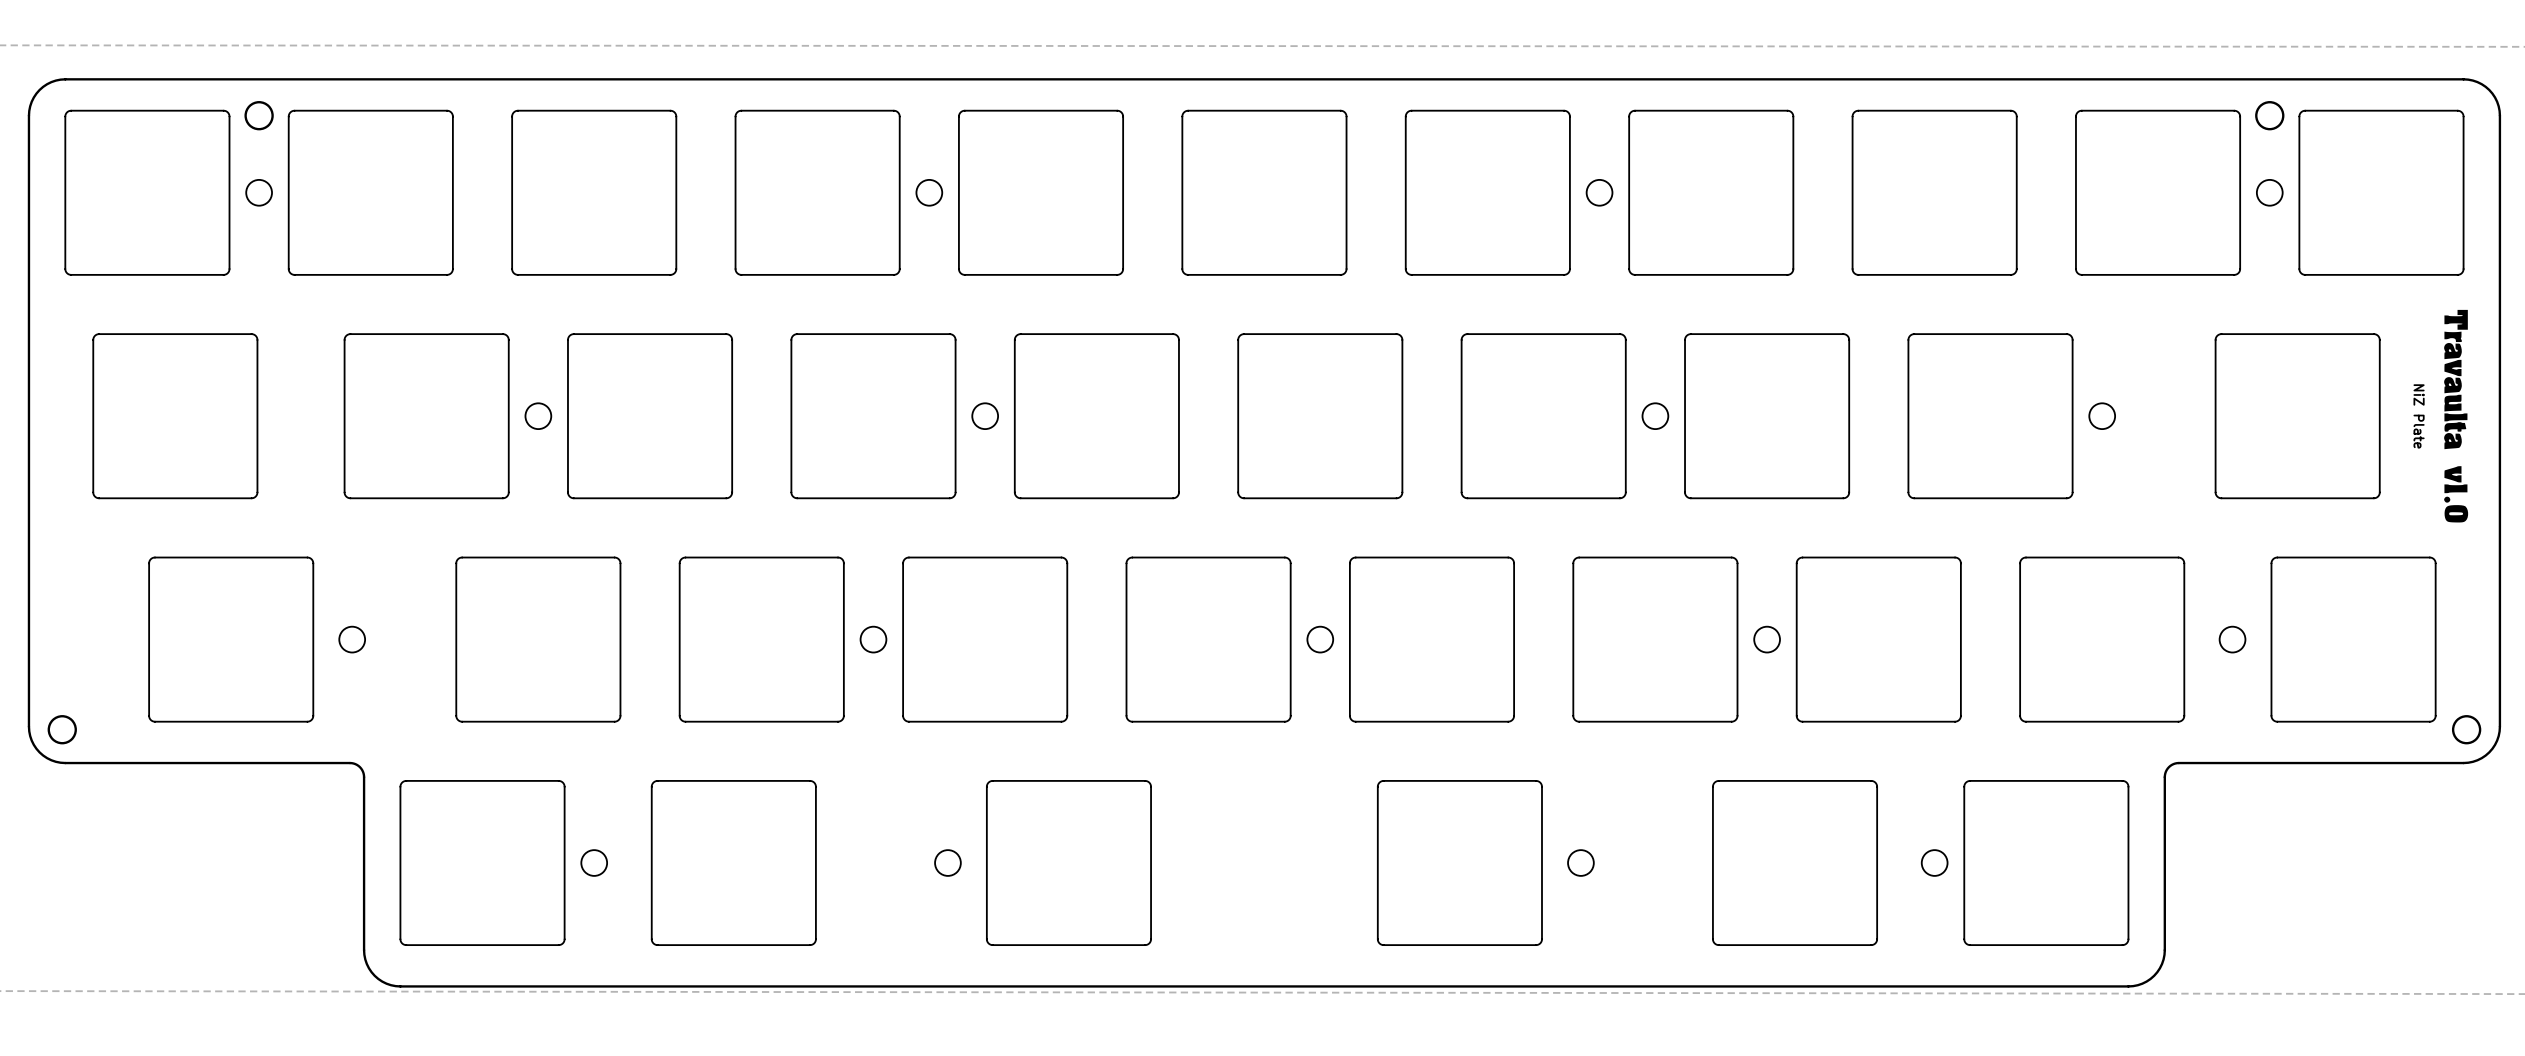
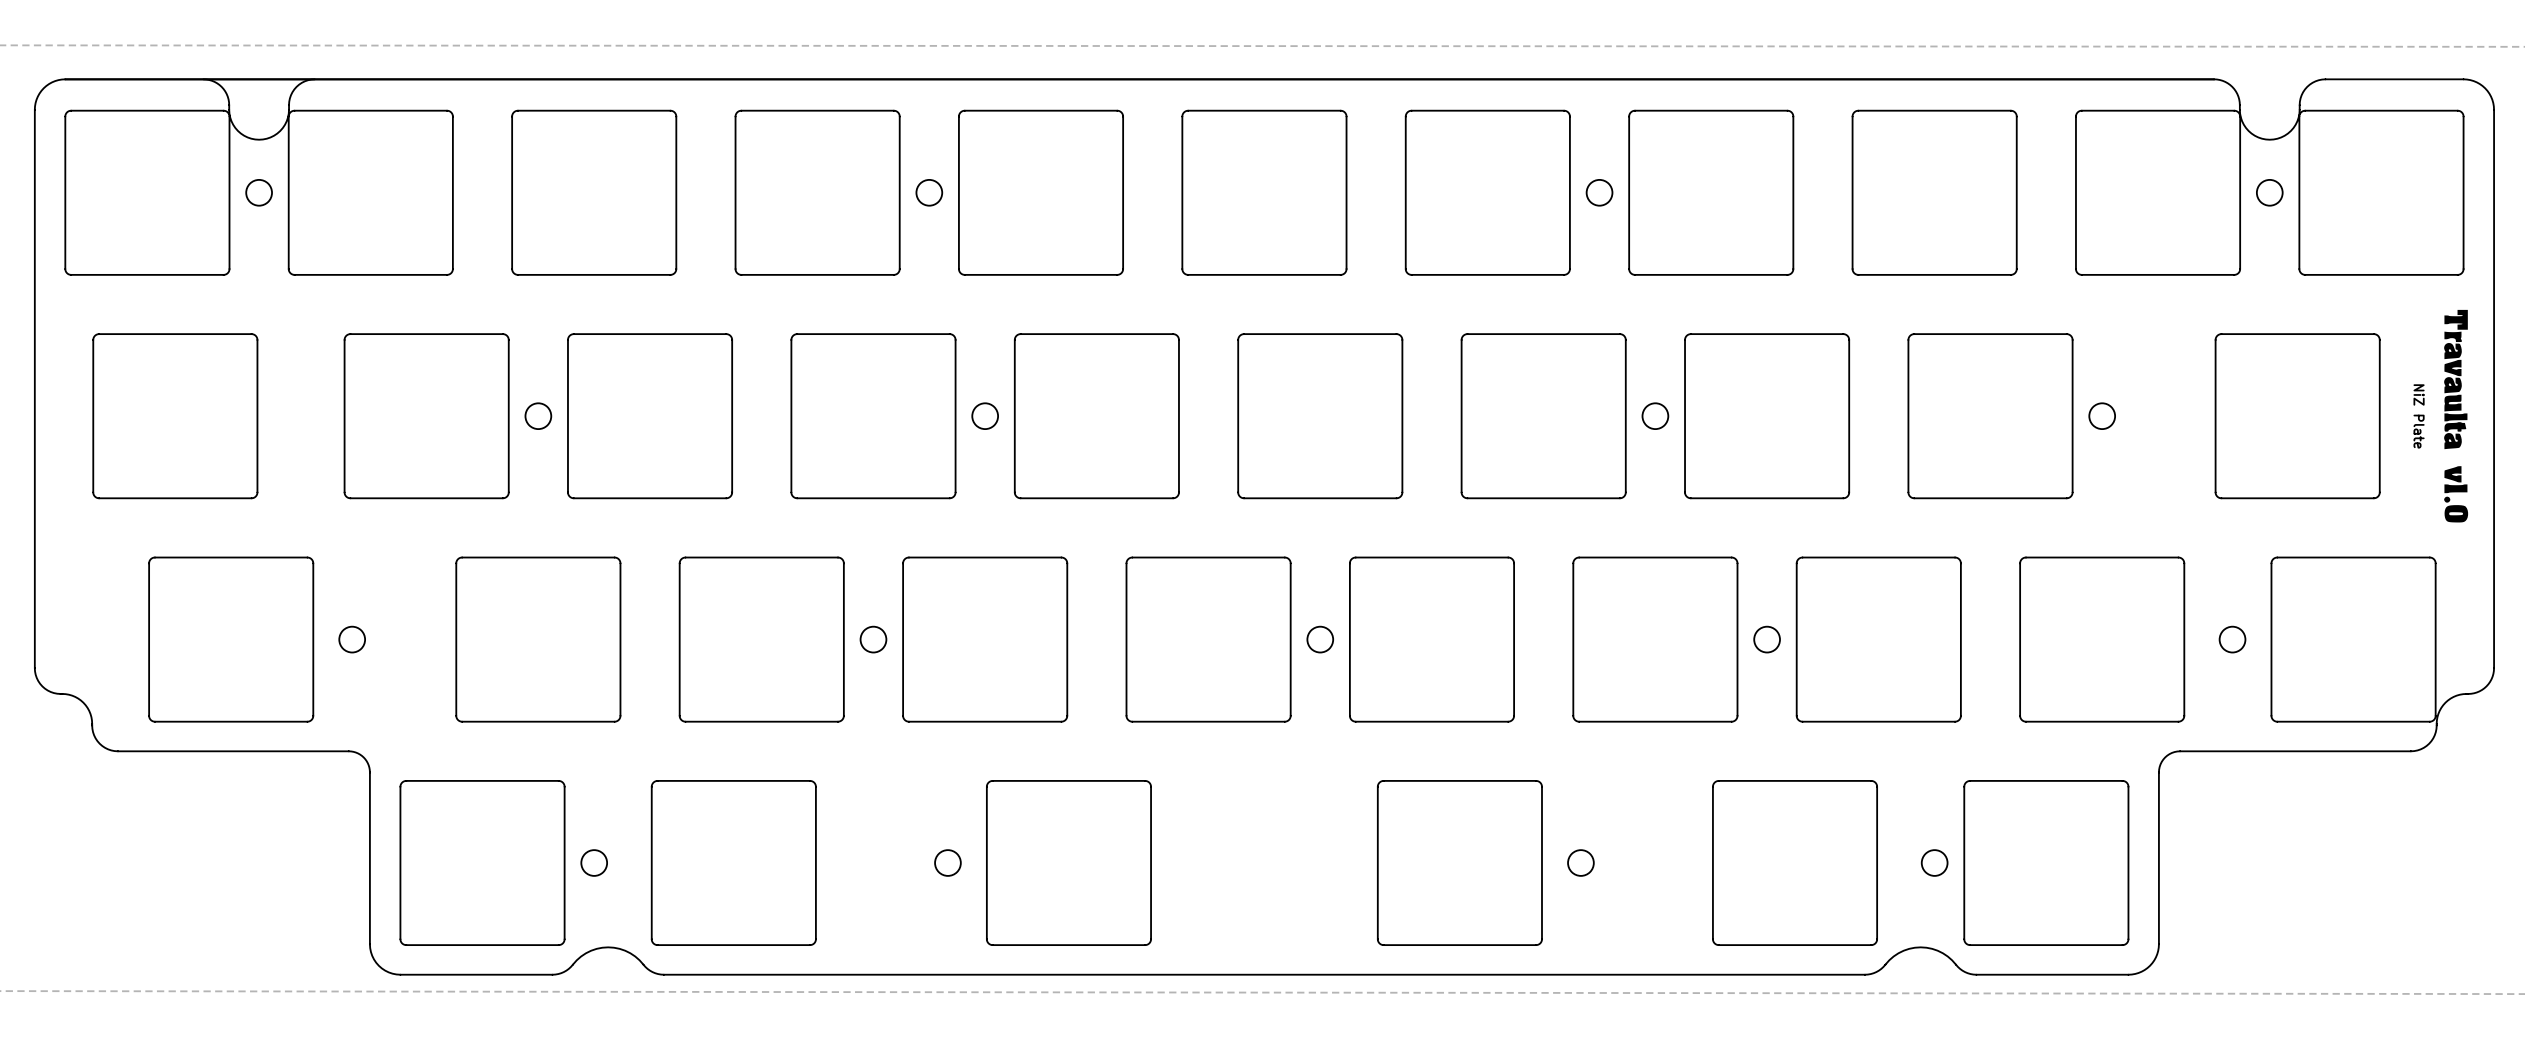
board edge: (65, 79) (51, 82) (39, 89) (31, 101) (28, 115) (28, 726) (31, 740) (43, 755) (60, 762) (350, 763) (357, 764) (362, 770) (364, 777) (364, 954) (368, 968) (378, 978) (391, 985) (400, 986) (2128, 986) (2146, 981) (2157, 972) (2164, 954) (2164, 777) (2170, 765) (2178, 763) (2468, 762) (2477, 760) (2489, 752) (2495, 744) (2499, 731) (2499, 115) (2497, 101) (2485, 86) (2468, 79) (2214, 79) -> (65, 79) (55, 81) (43, 88) (37, 96) (34, 109) (34, 668) (36, 678) (47, 690) (72, 695) (83, 702) (90, 713) (95, 738) (102, 745) (111, 750) (348, 751) (361, 755) (367, 763) (369, 772) (370, 948) (374, 959) (381, 968) (392, 973) (400, 974) (555, 974) (566, 970) (585, 953) (596, 948) (608, 947) (619, 948) (630, 953) (649, 970) (663, 974) (1864, 974) (1878, 970) (1898, 953) (1909, 948) (1920, 947) (1932, 948) (1942, 953) (1962, 970) (1973, 974) (2128, 974) (2141, 971) (2152, 963) (2158, 947) (2158, 772) (2160, 764) (2167, 755) (2180, 751) (2417, 750) (2426, 745) (2433, 738) (2438, 713) (2445, 702) (2456, 695) (2481, 690) (2490, 681) (2493, 671) (2494, 109) (2491, 96) (2482, 85) (2466, 79) (2322, 79) (2309, 84) (2303, 92) (2299, 101) (2298, 117) (2293, 128) (2281, 137) (2269, 139) (2258, 137) (2248, 130) (2240, 117) (2239, 99) (2235, 91) (2225, 81) (2214, 79)
board edge: none -> (314, 79) (304, 81) (294, 89) (289, 98) (288, 117) (280, 130) (270, 137) (259, 139) (247, 137) (237, 130) (230, 117) (228, 99) (225, 91) (217, 83) (203, 79)
round board edge: [244, 101, 274, 131] -> none
round board edge: [2255, 101, 2285, 131] -> none
round board edge: [47, 715, 77, 745] -> none
round board edge: [2451, 715, 2482, 745] -> none

